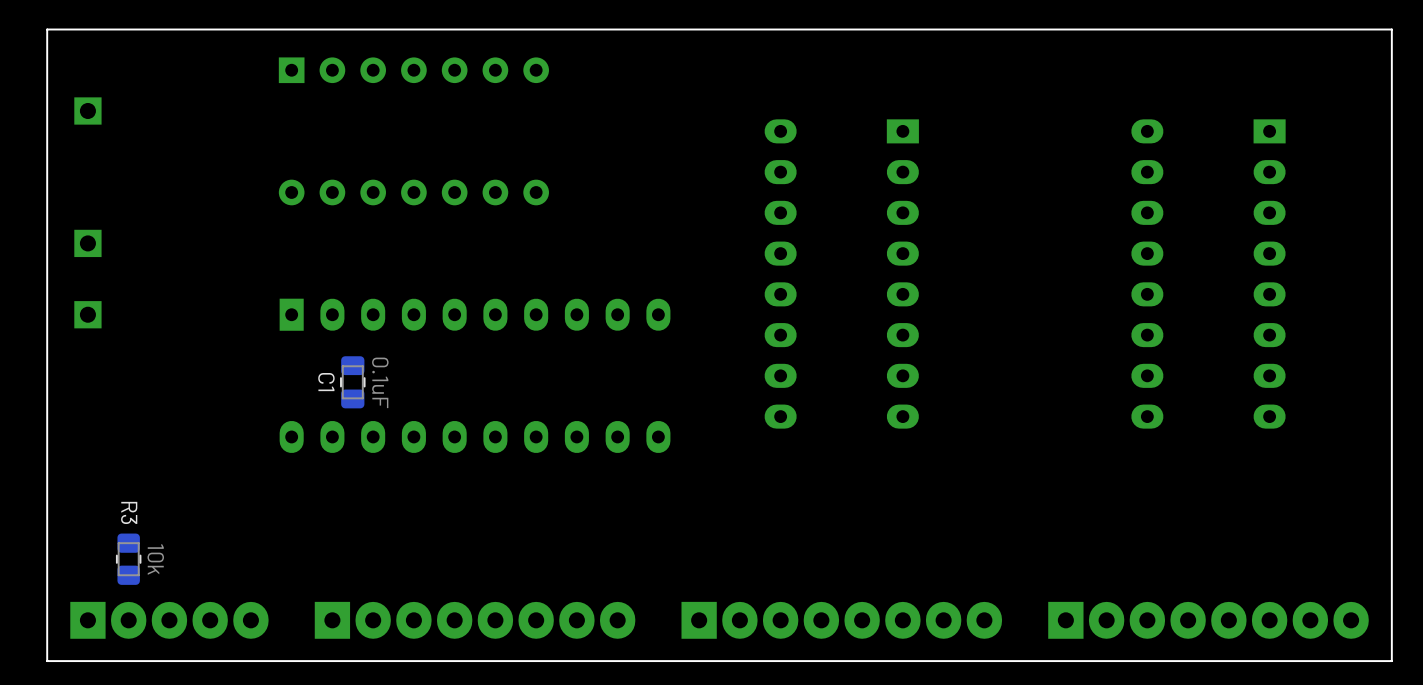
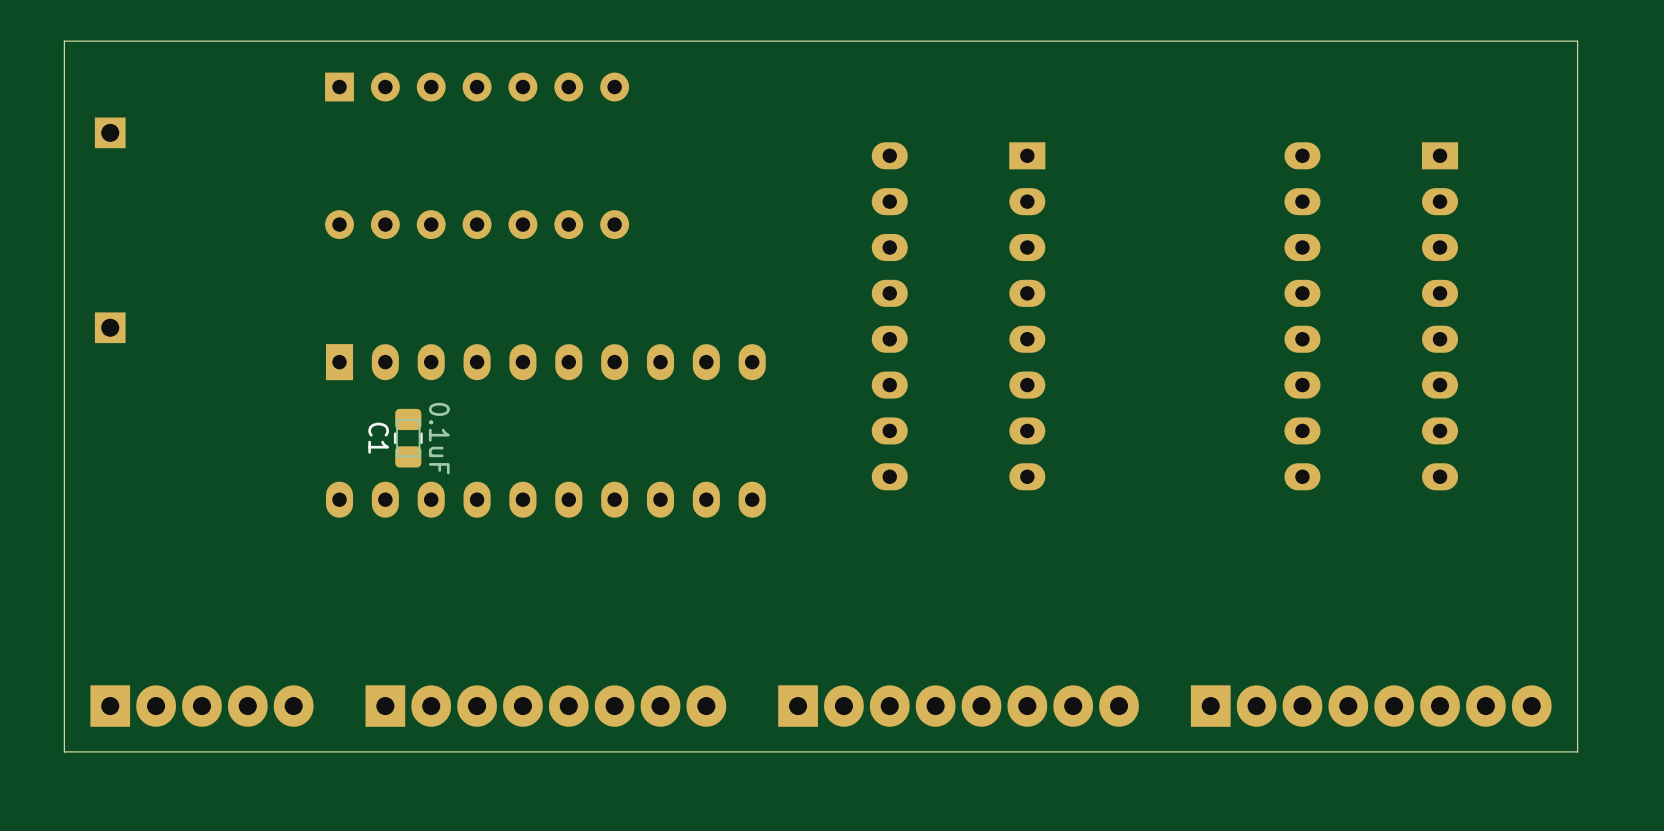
part: (87, 243) -> none
part: none -> (110, 327)
part: (87, 314) -> none
R3: 10k (128, 559) -> none

